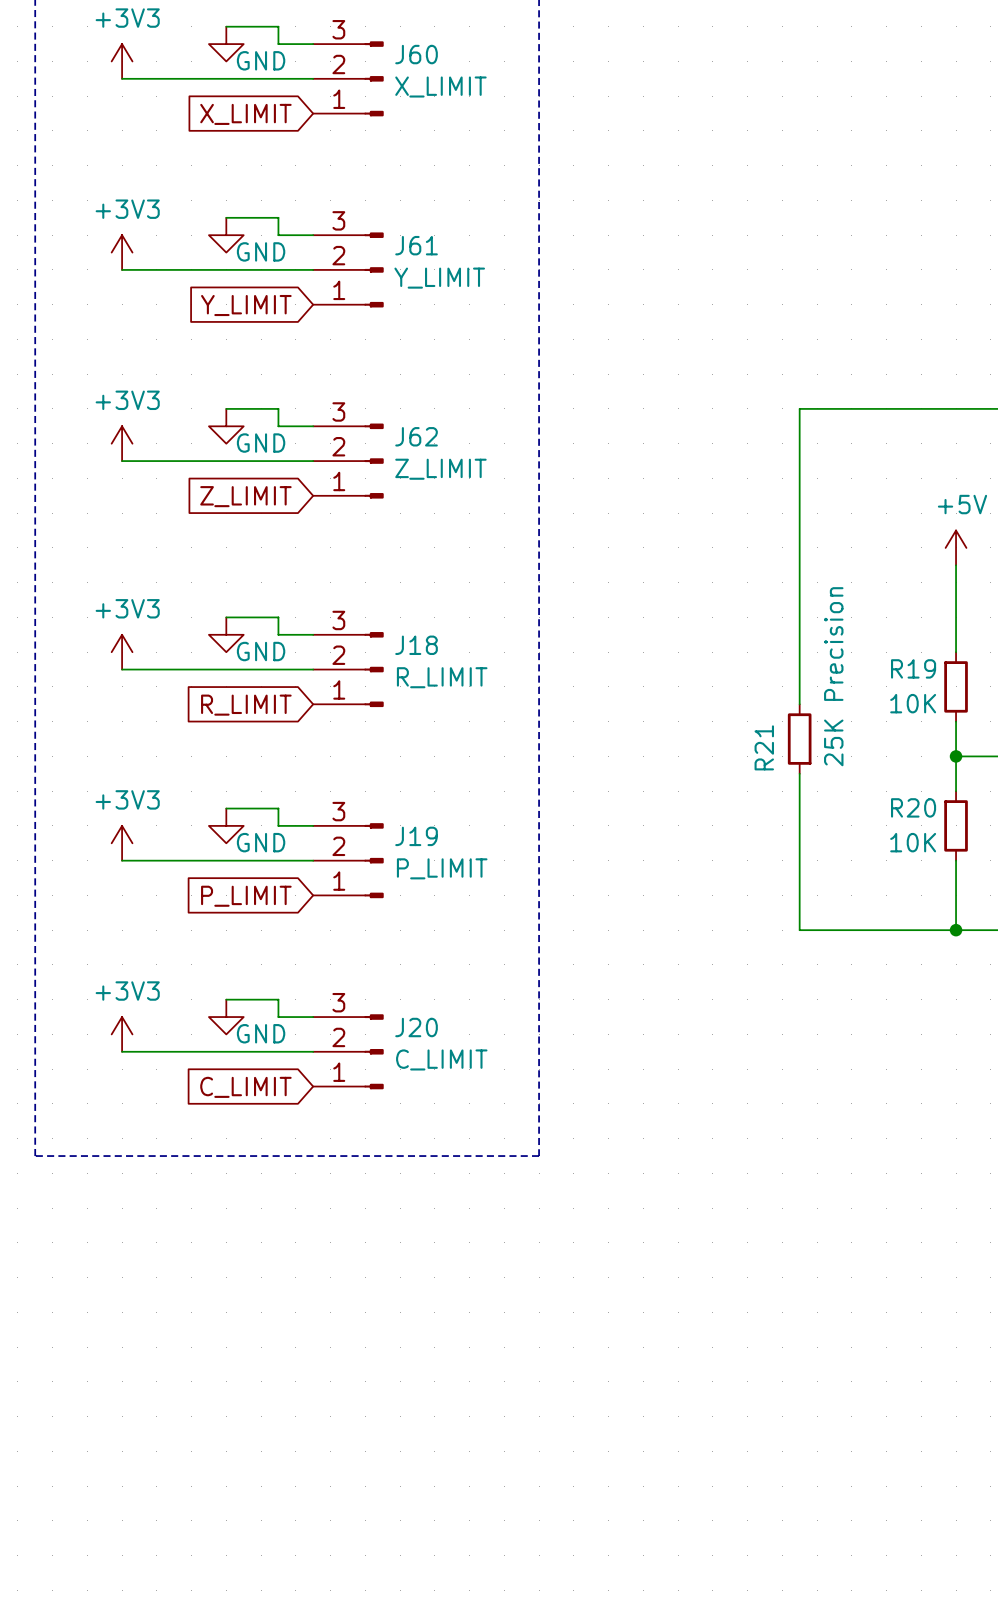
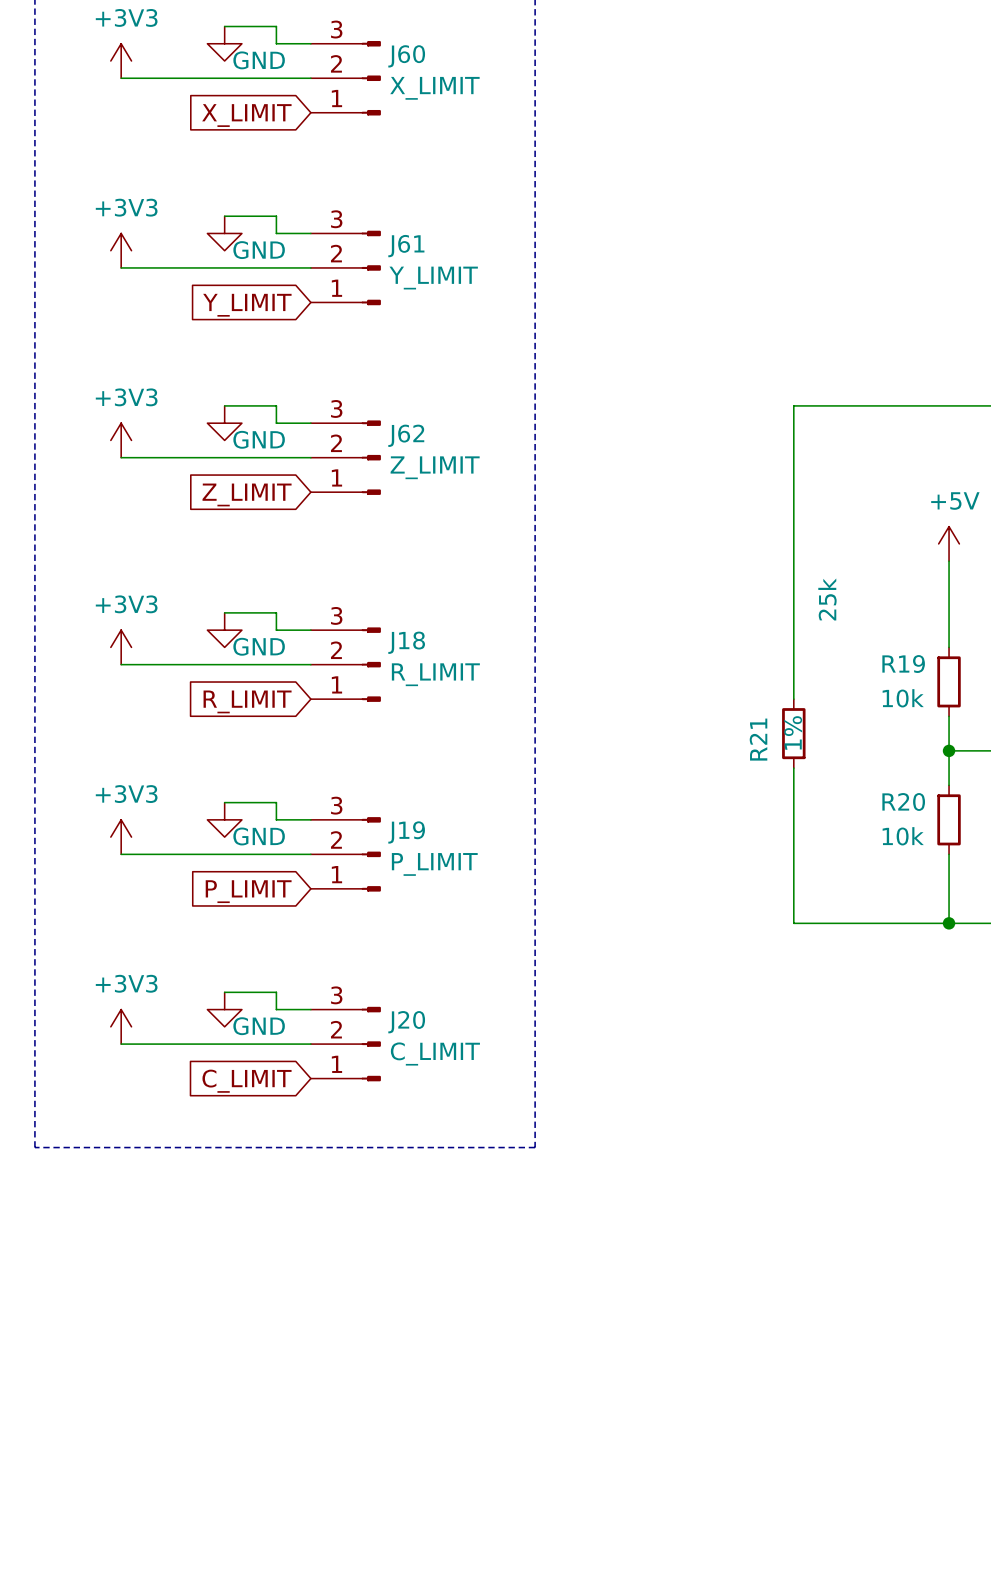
R21 value: 25K Precision (833, 676) -> 25k (827, 599)
R19 value: 10K (913, 703) -> 10k (903, 698)
R21 text: none -> 1% (793, 732)
R20 value: 10K (913, 842) -> 10k (903, 836)

